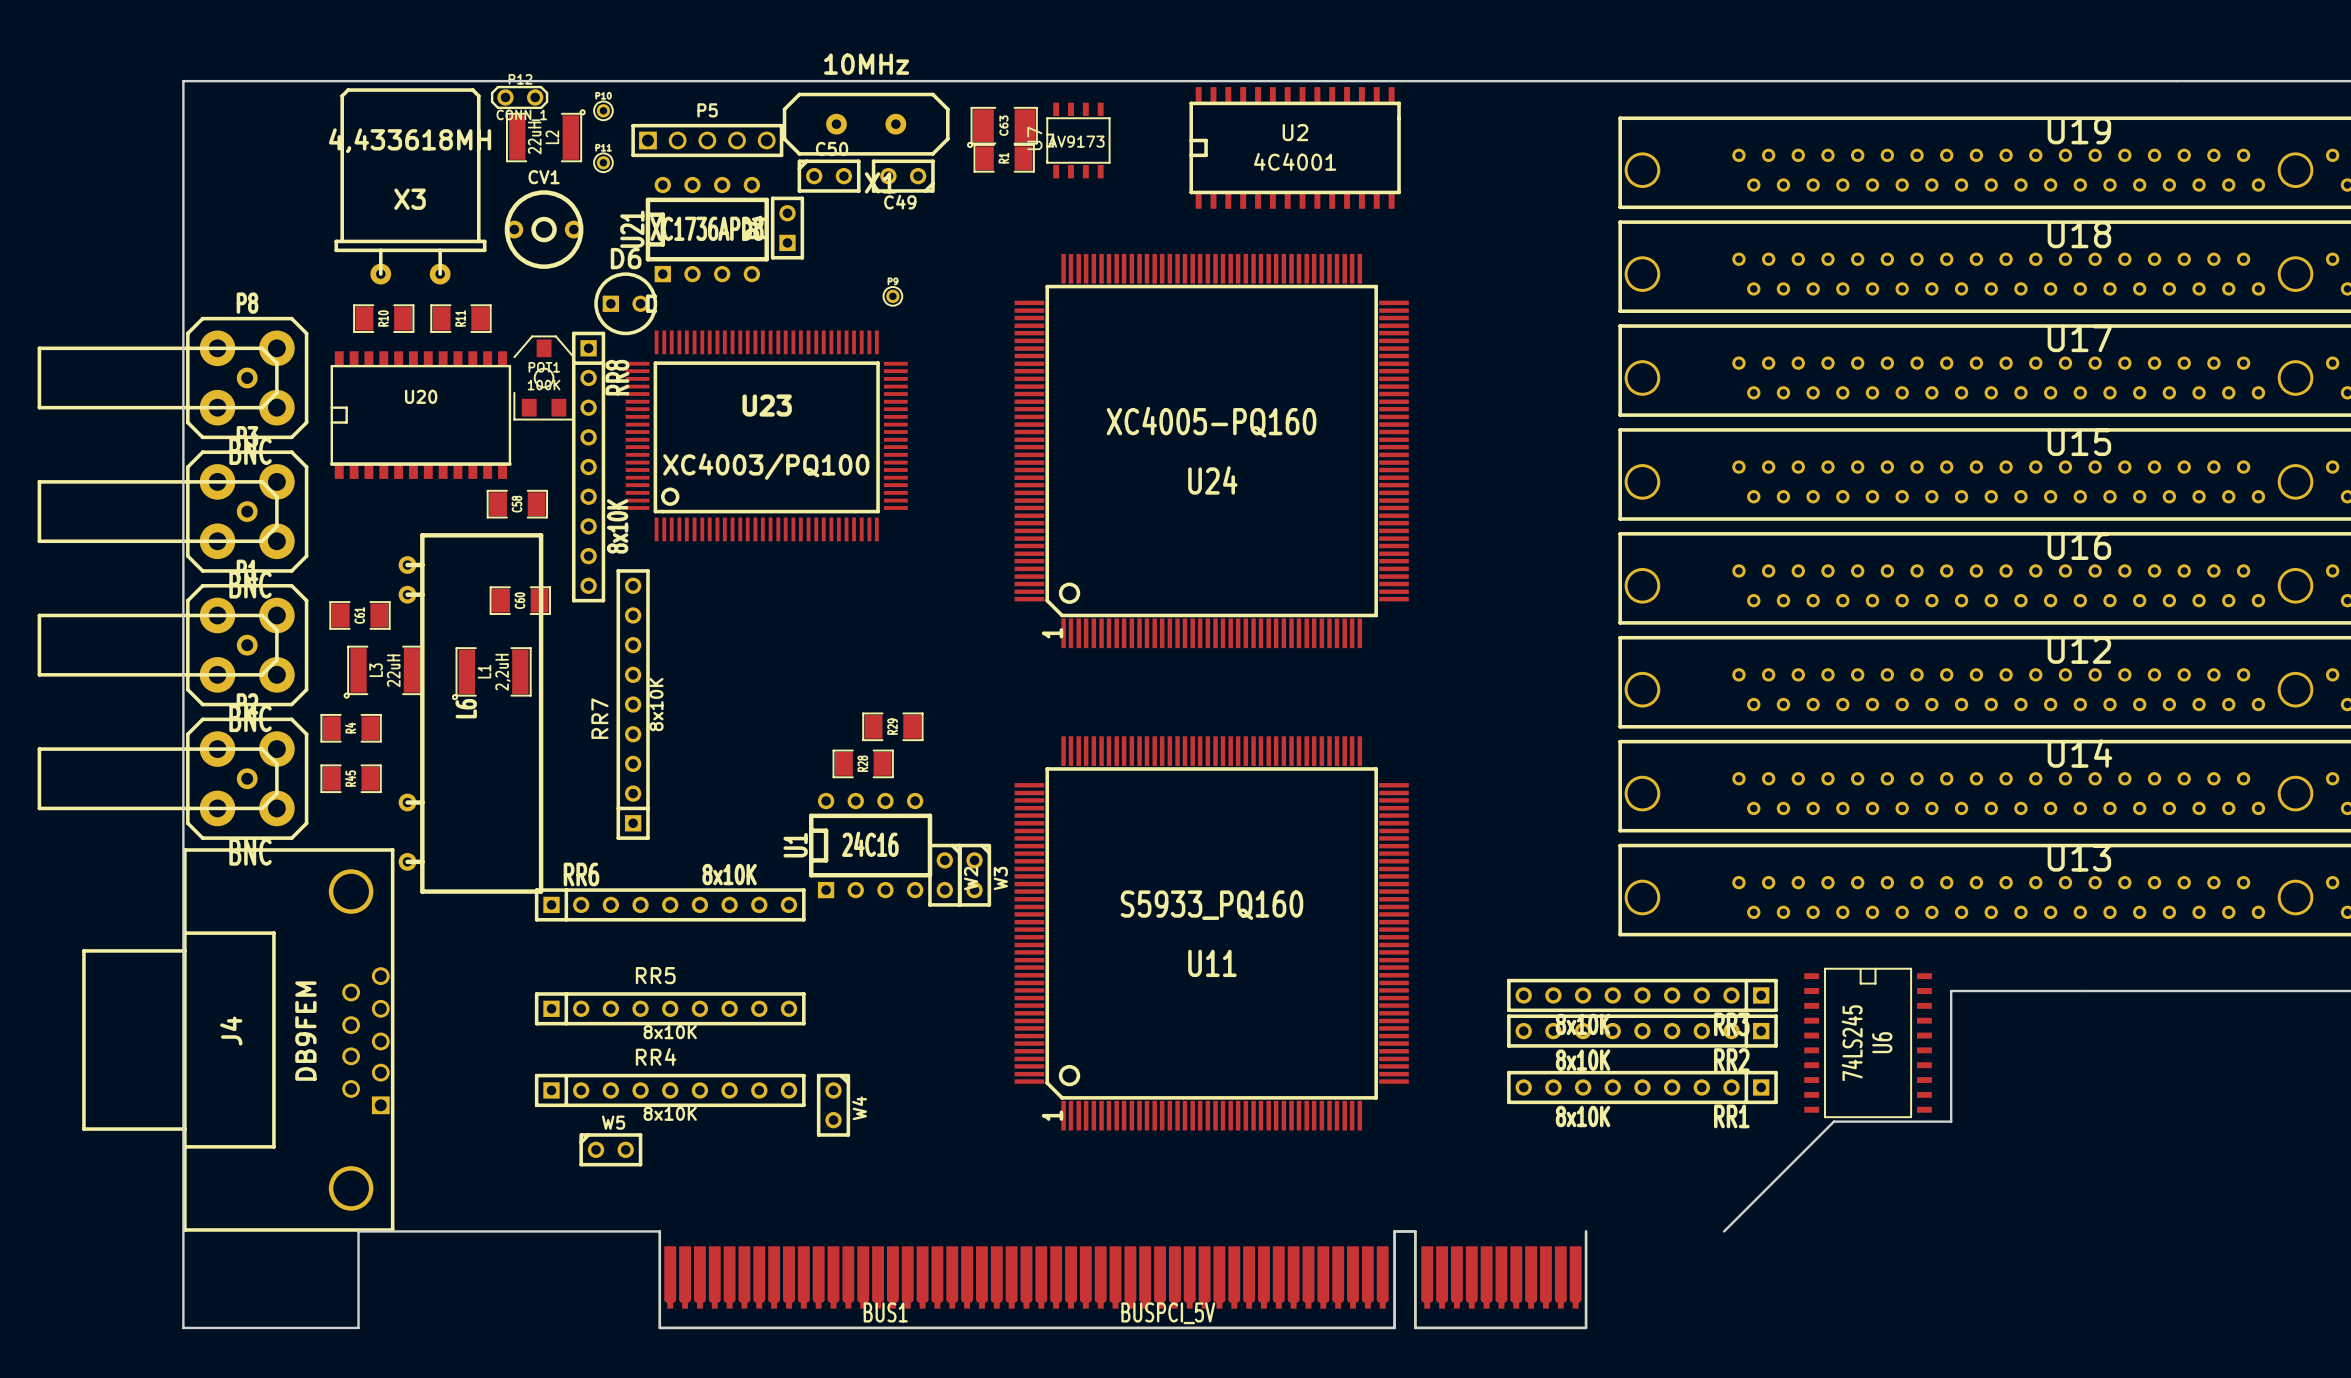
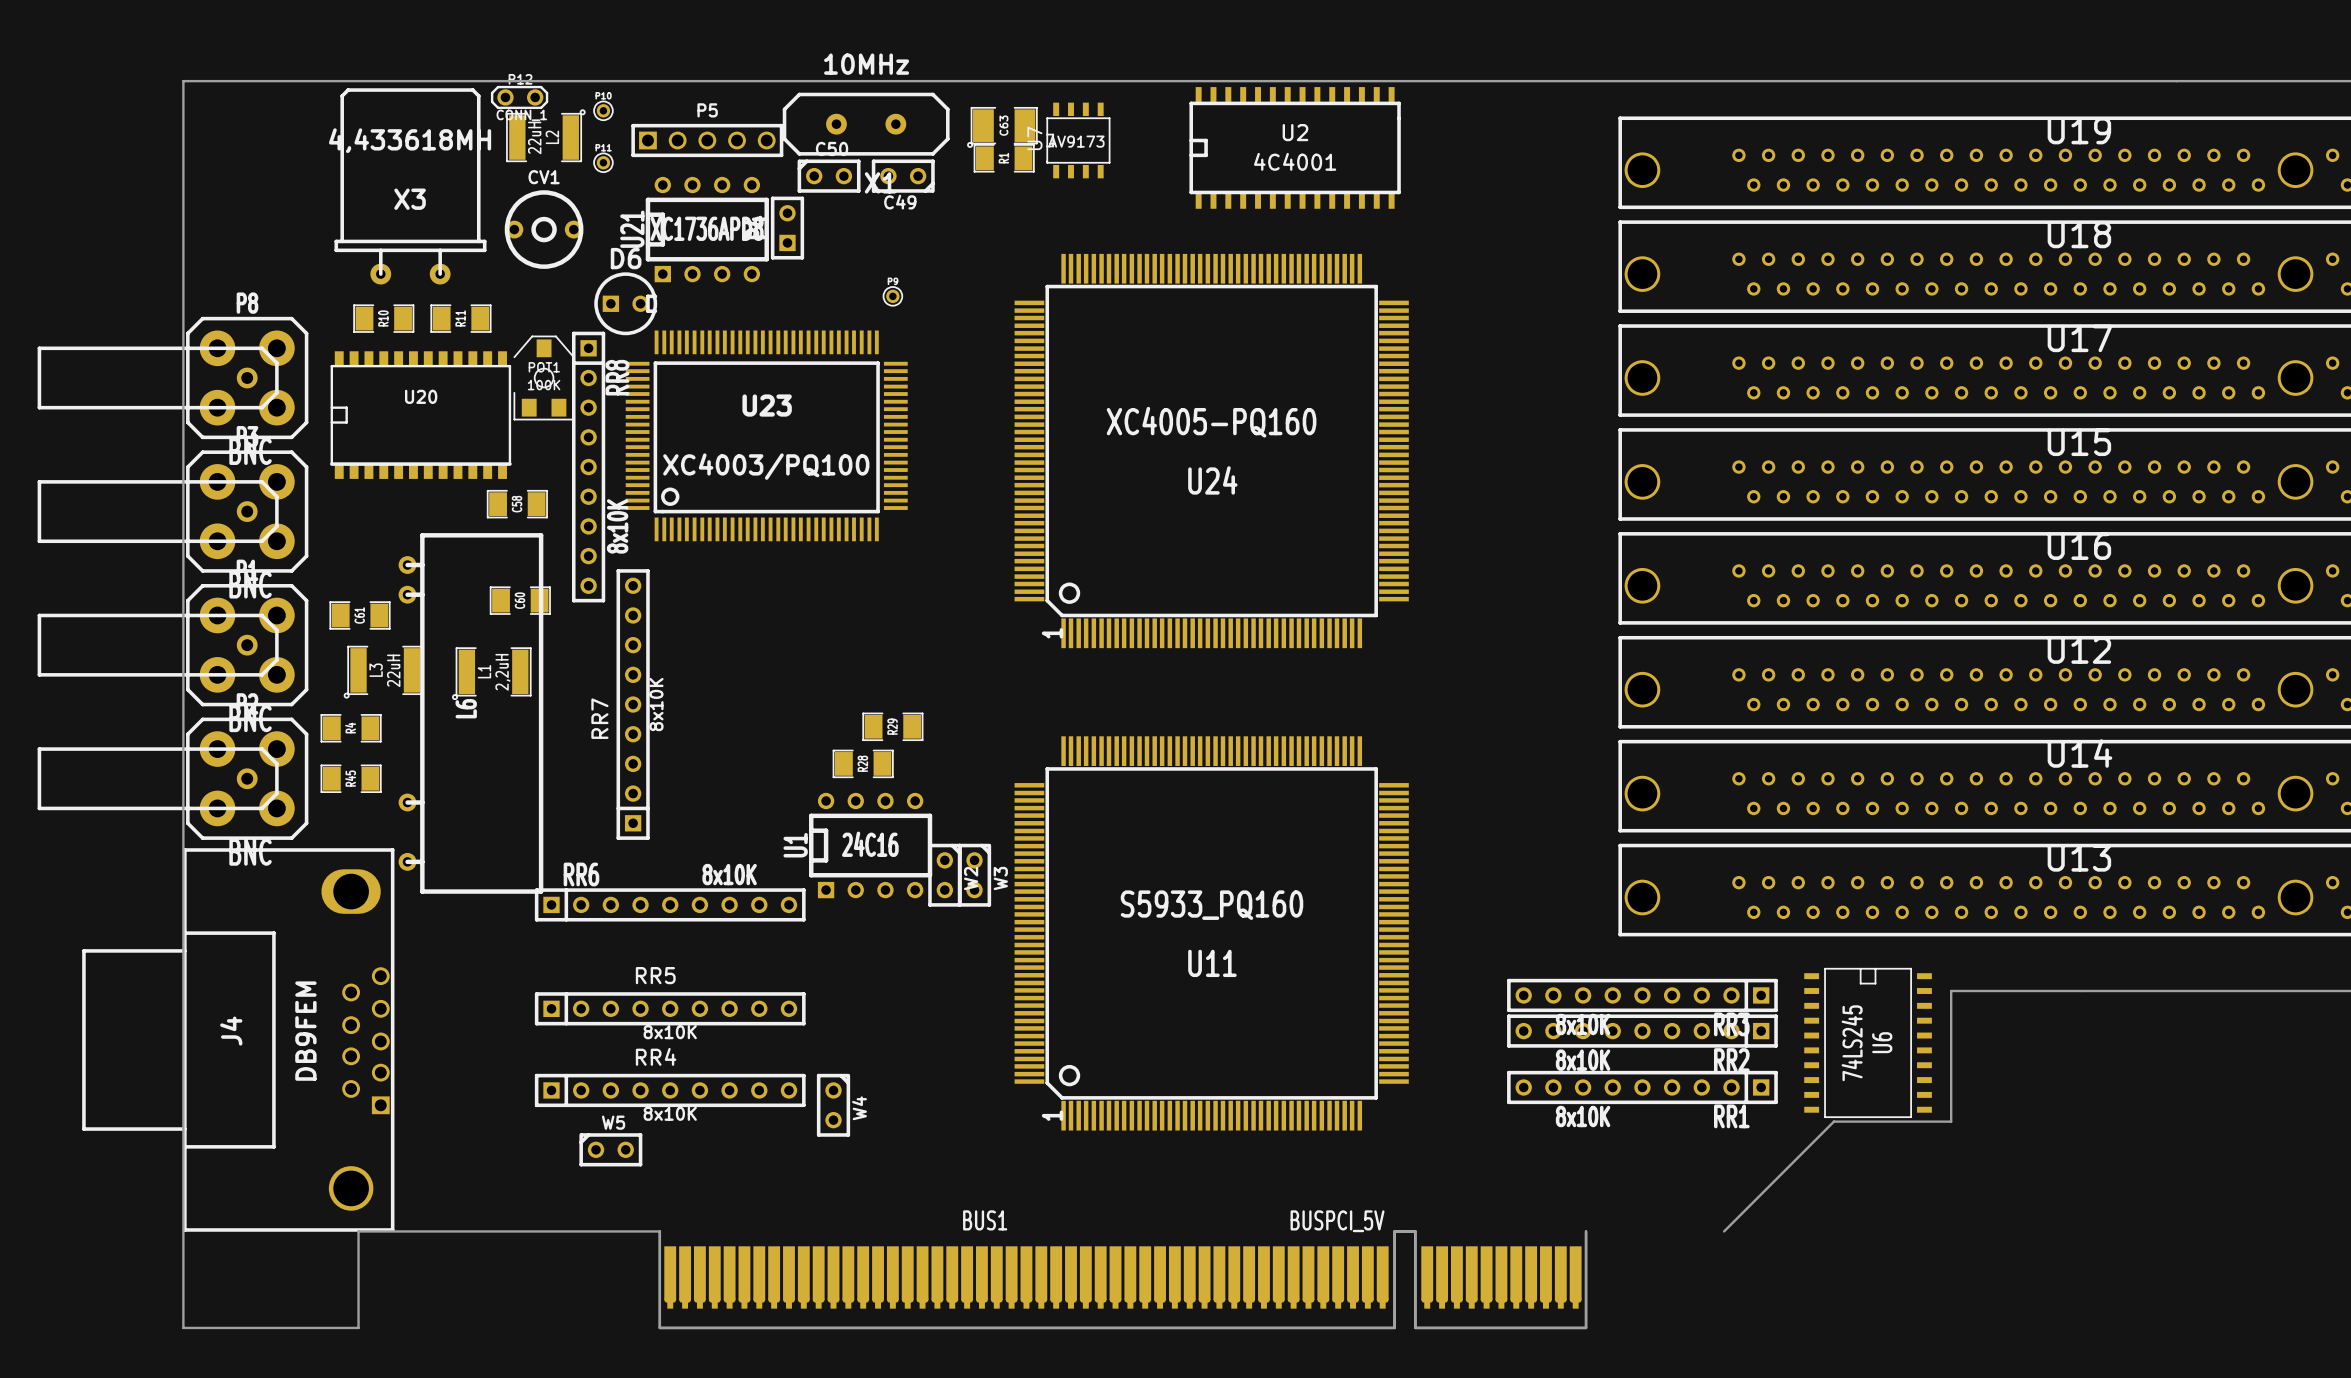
J4 footprint: [82, 848, 395, 1232] -> [82, 848, 395, 1232]
BUS1 name position: BUS1 (885, 1312) -> BUS1 (985, 1220)
BUS1 value position: BUSPCI_5V (1168, 1313) -> BUSPCI_5V (1337, 1221)

